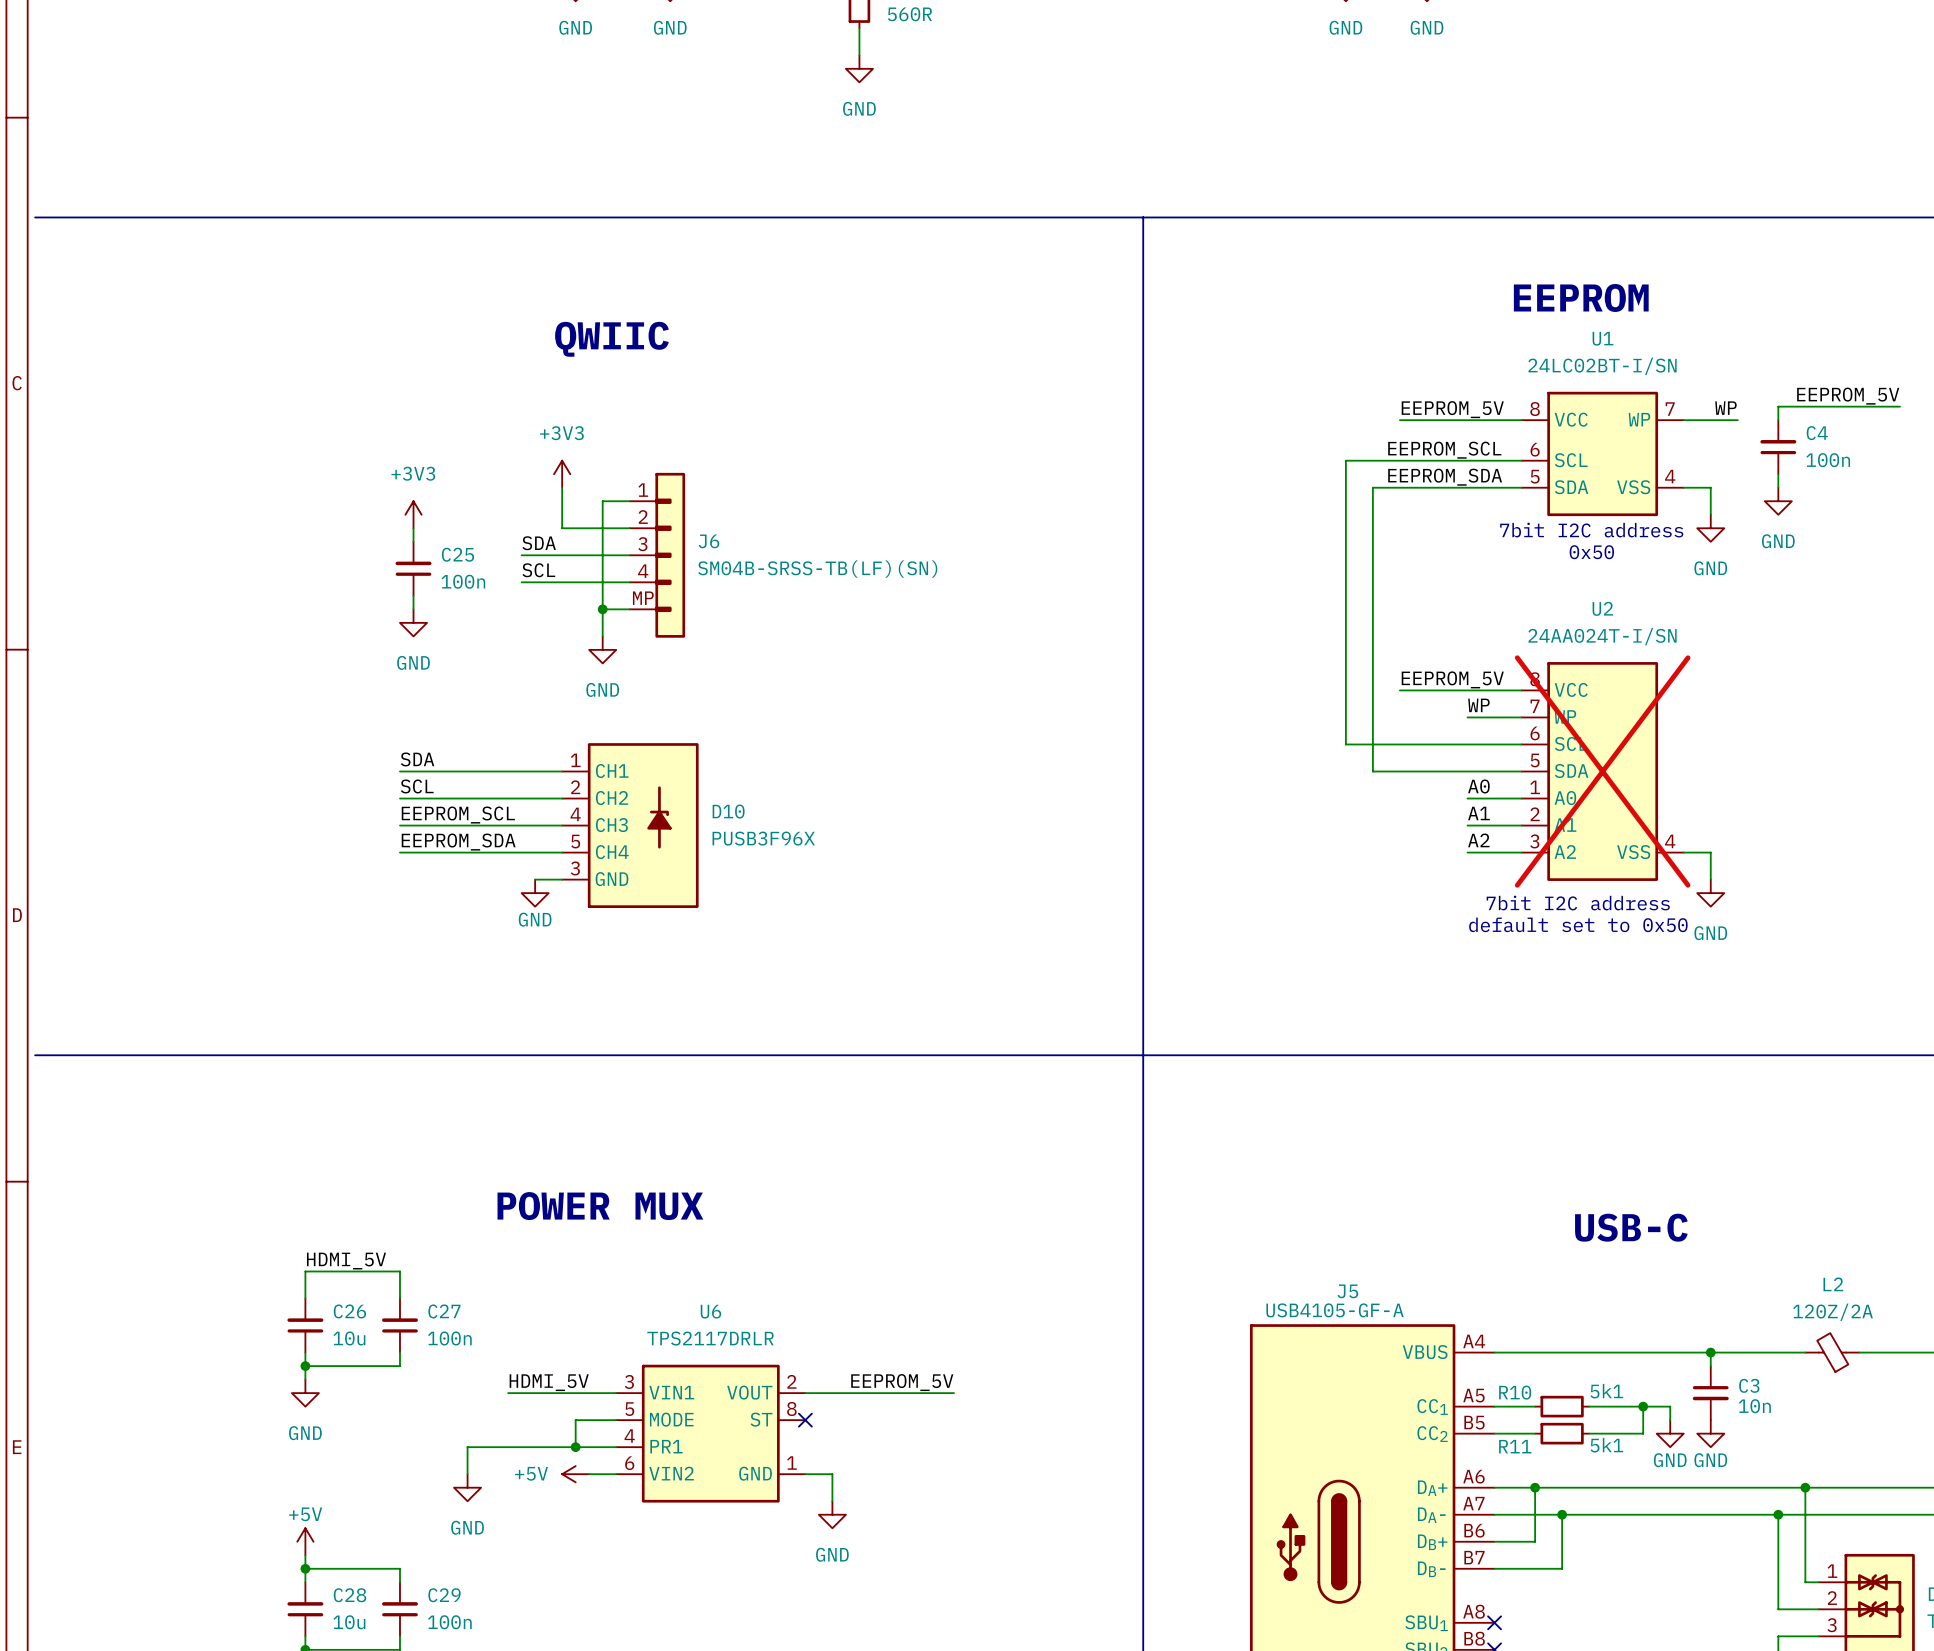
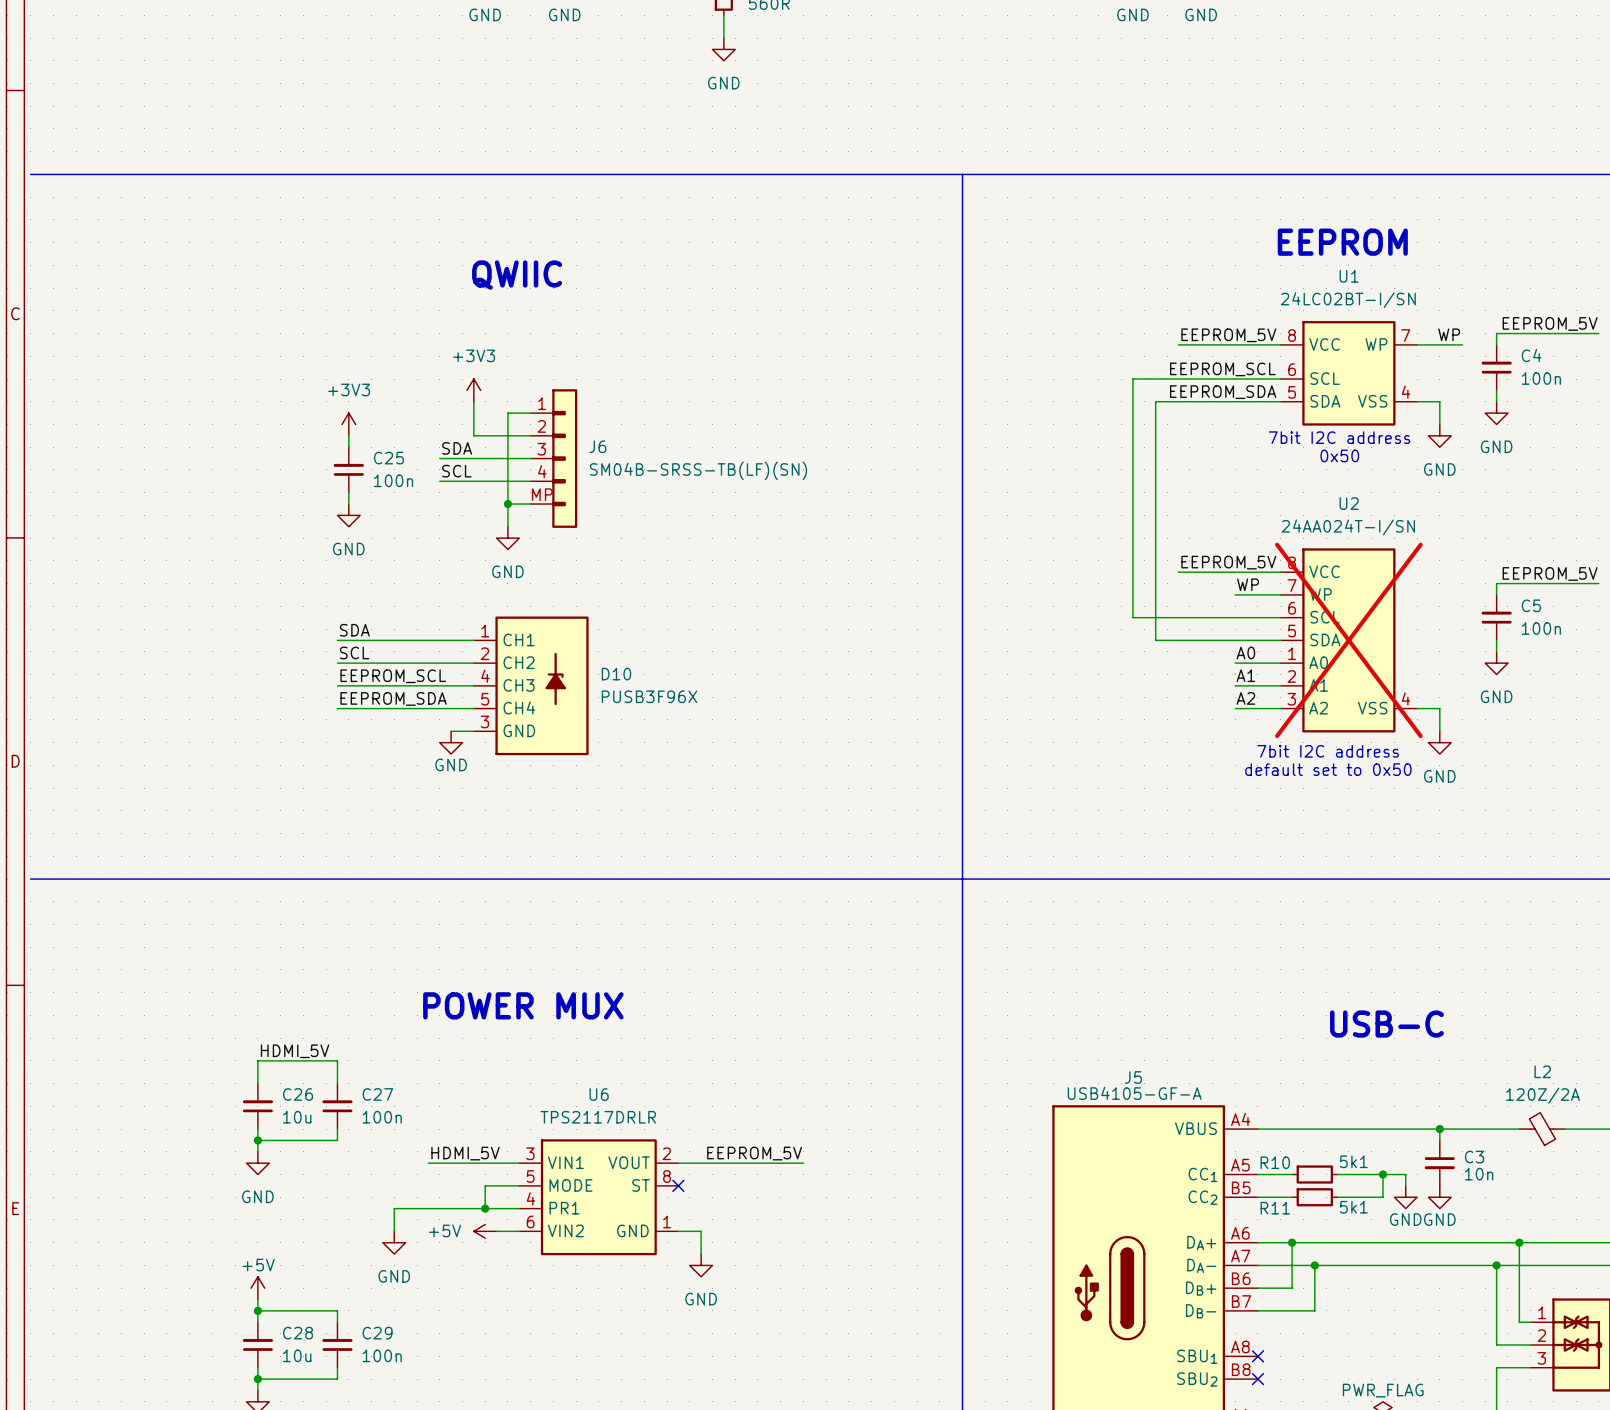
label: none -> EEPROM_5V (1550, 573)
wire: none -> (1598, 583) (1496, 583) (1496, 594)
C5: none -> (1496, 617)
wire: none -> (1496, 640) (1496, 651)
power symbol: none -> GND (1496, 663)

